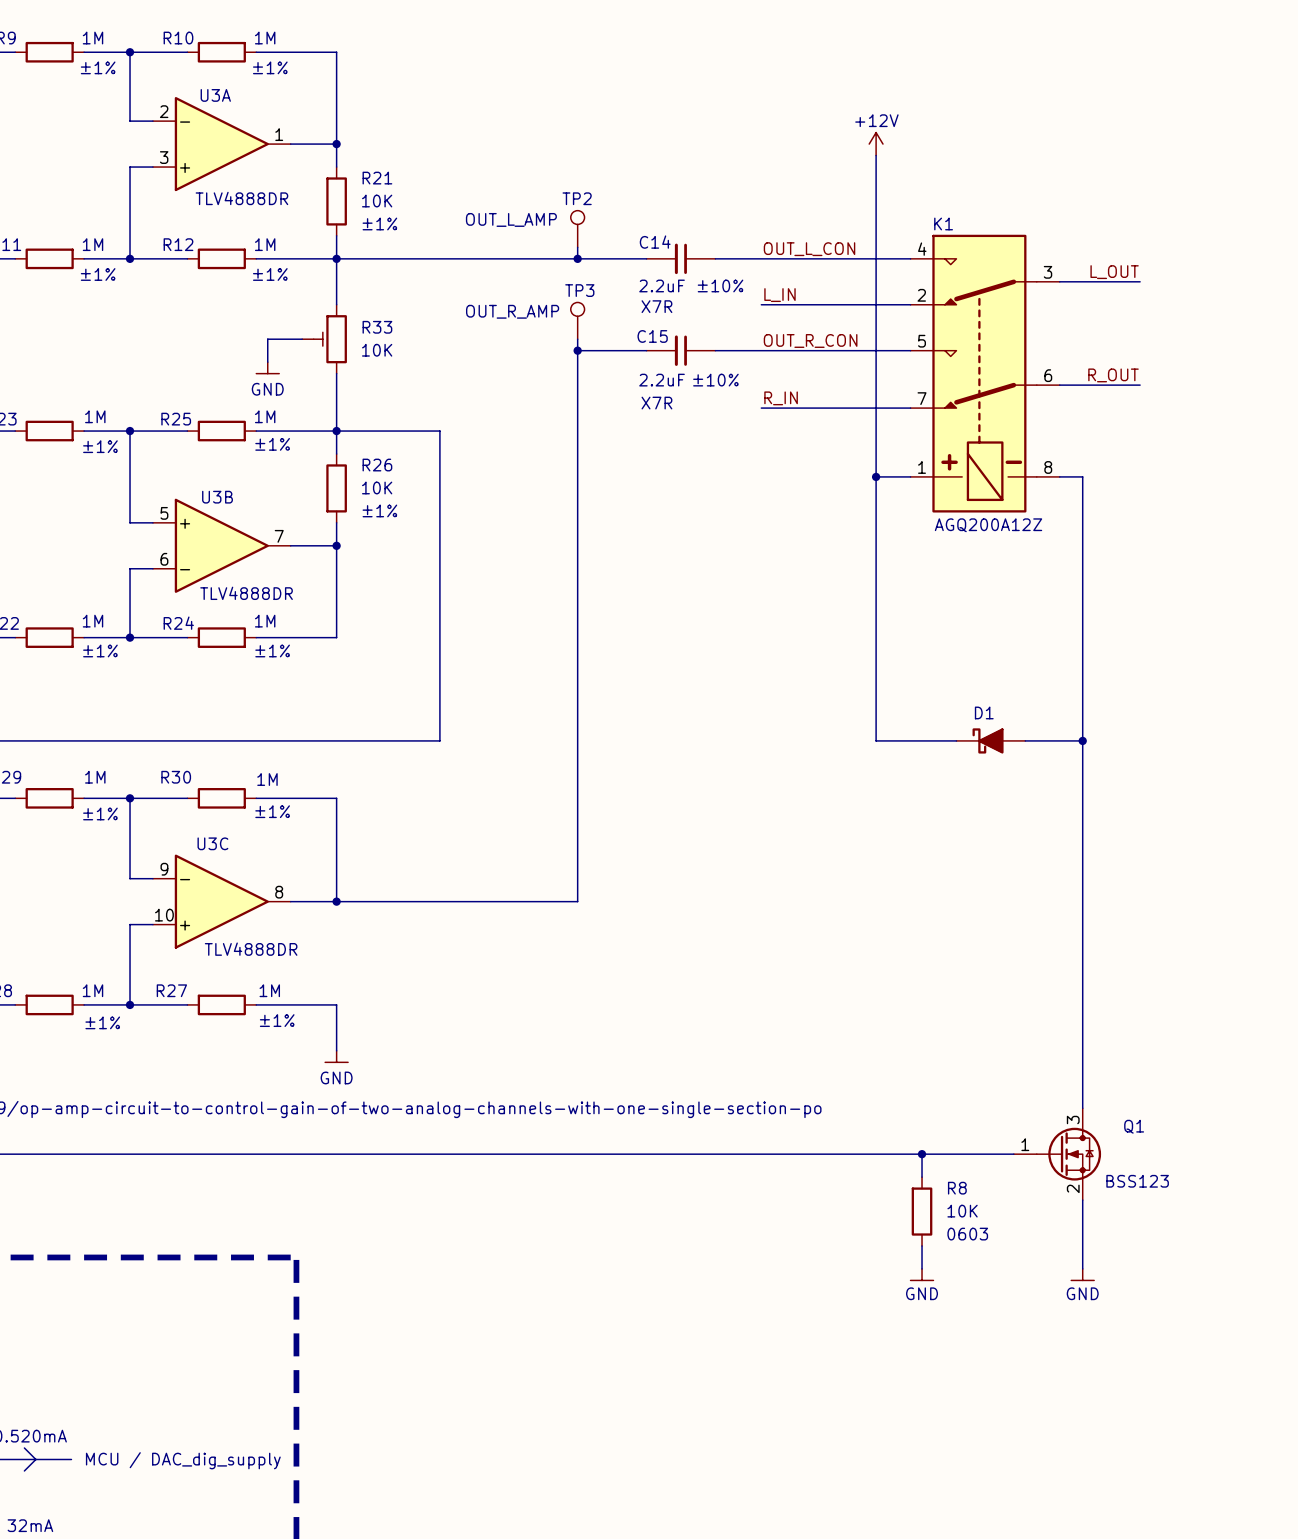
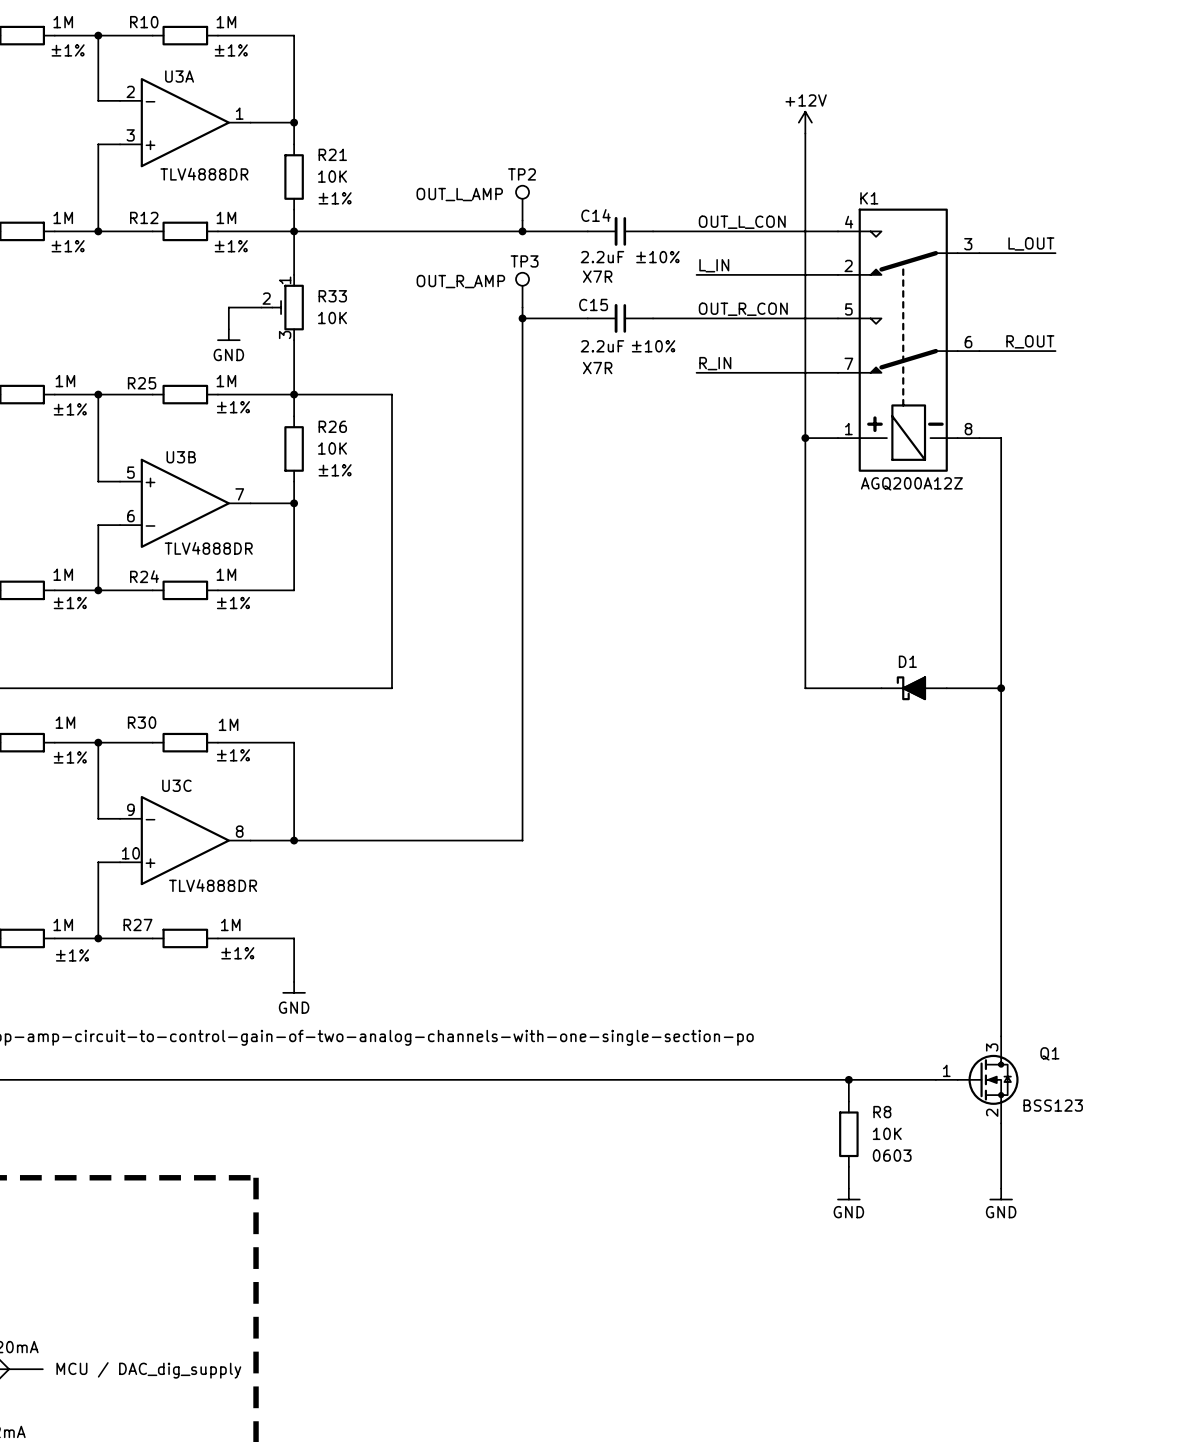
R33 pin number: none -> 1 (285, 280)
R33 pin number: none -> 2 (266, 298)
R33 pin number: none -> 3 (285, 335)

